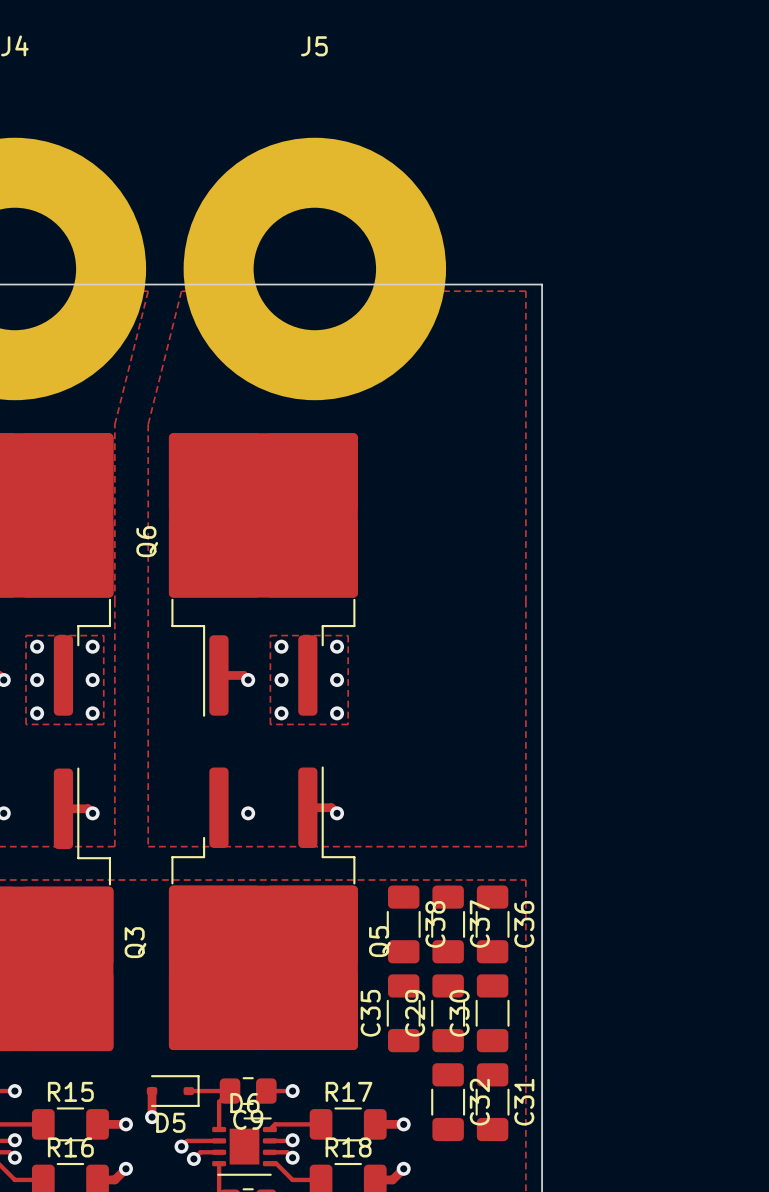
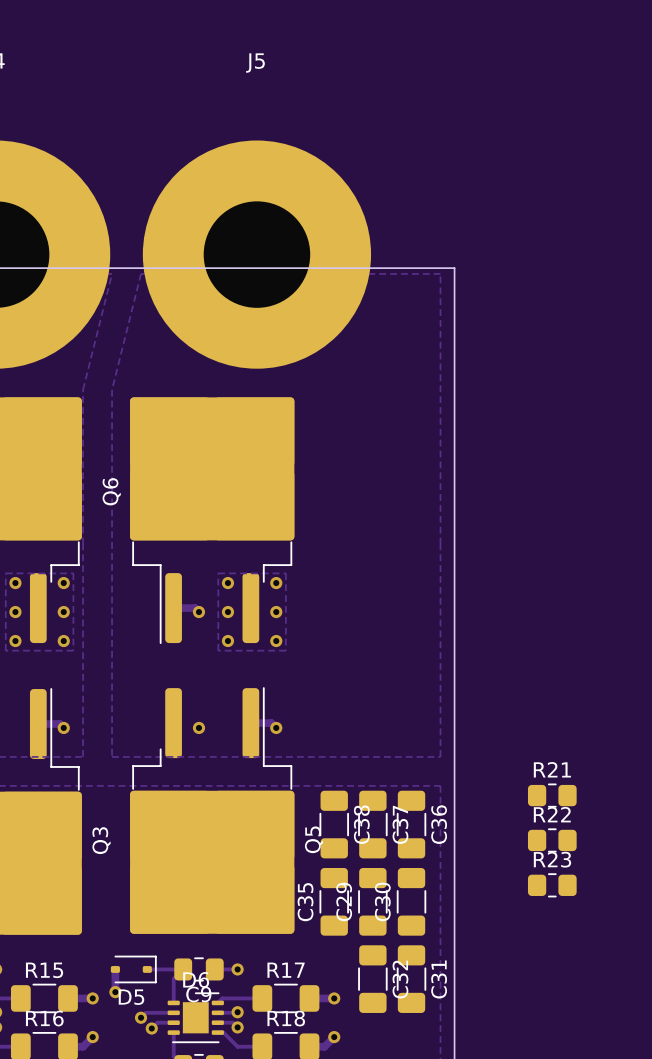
R21: none -> (552, 795)
R22: none -> (552, 840)
R23: none -> (552, 885)

